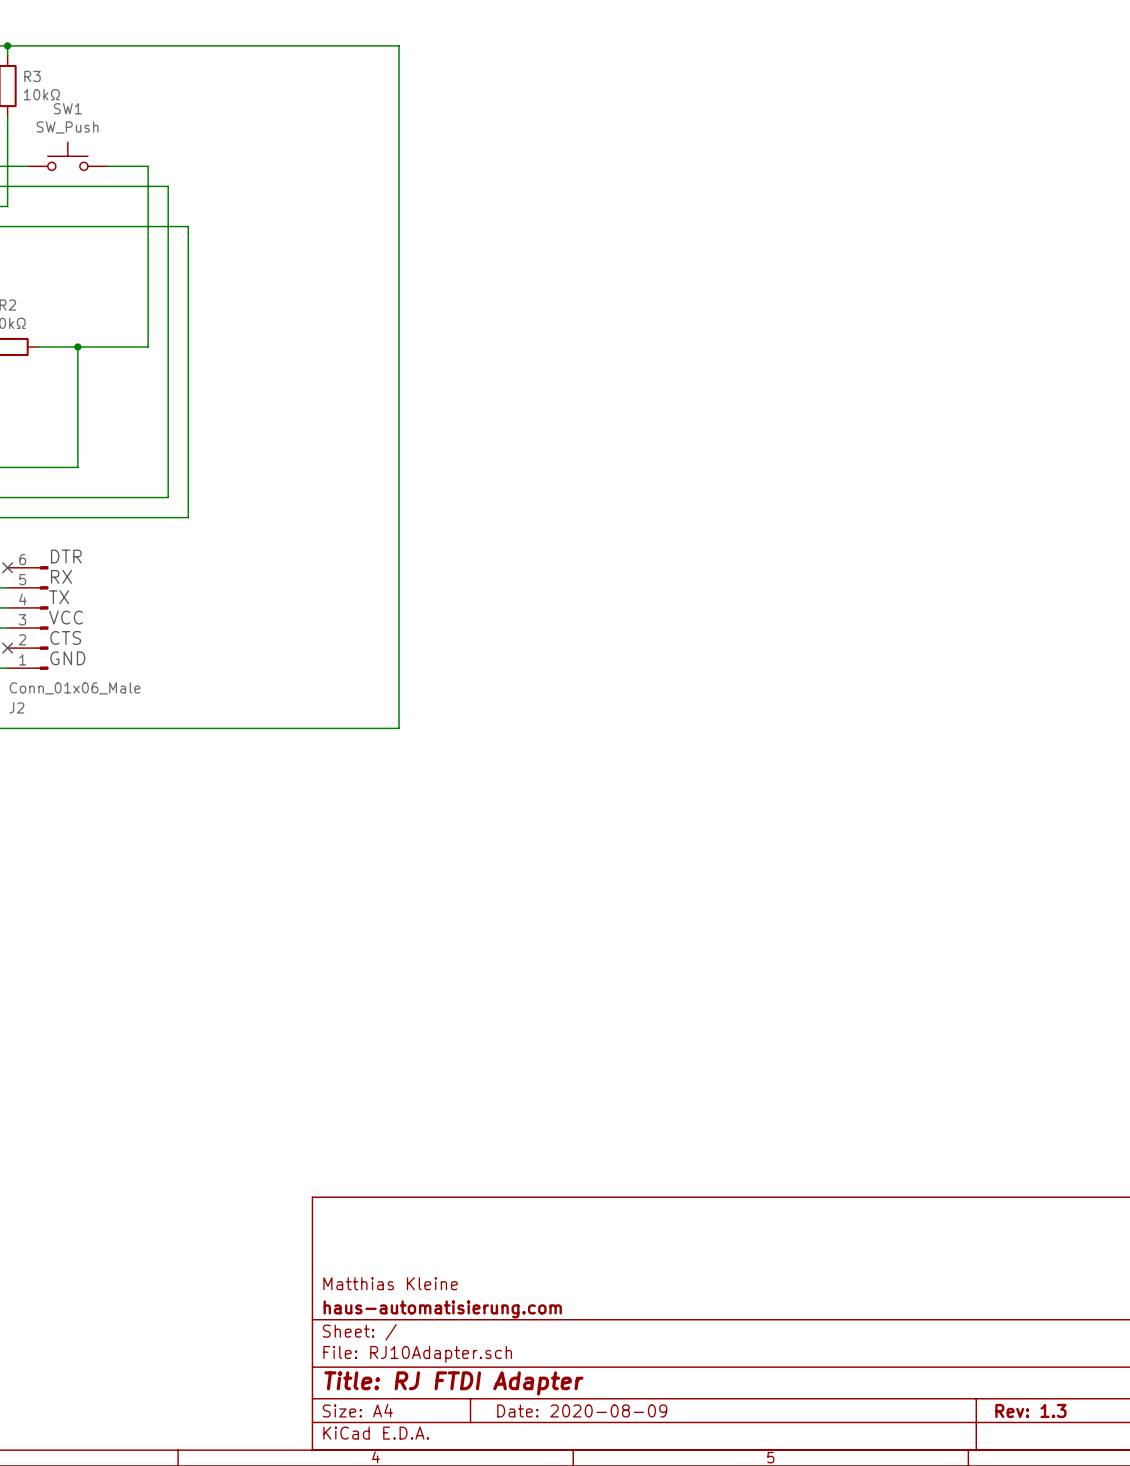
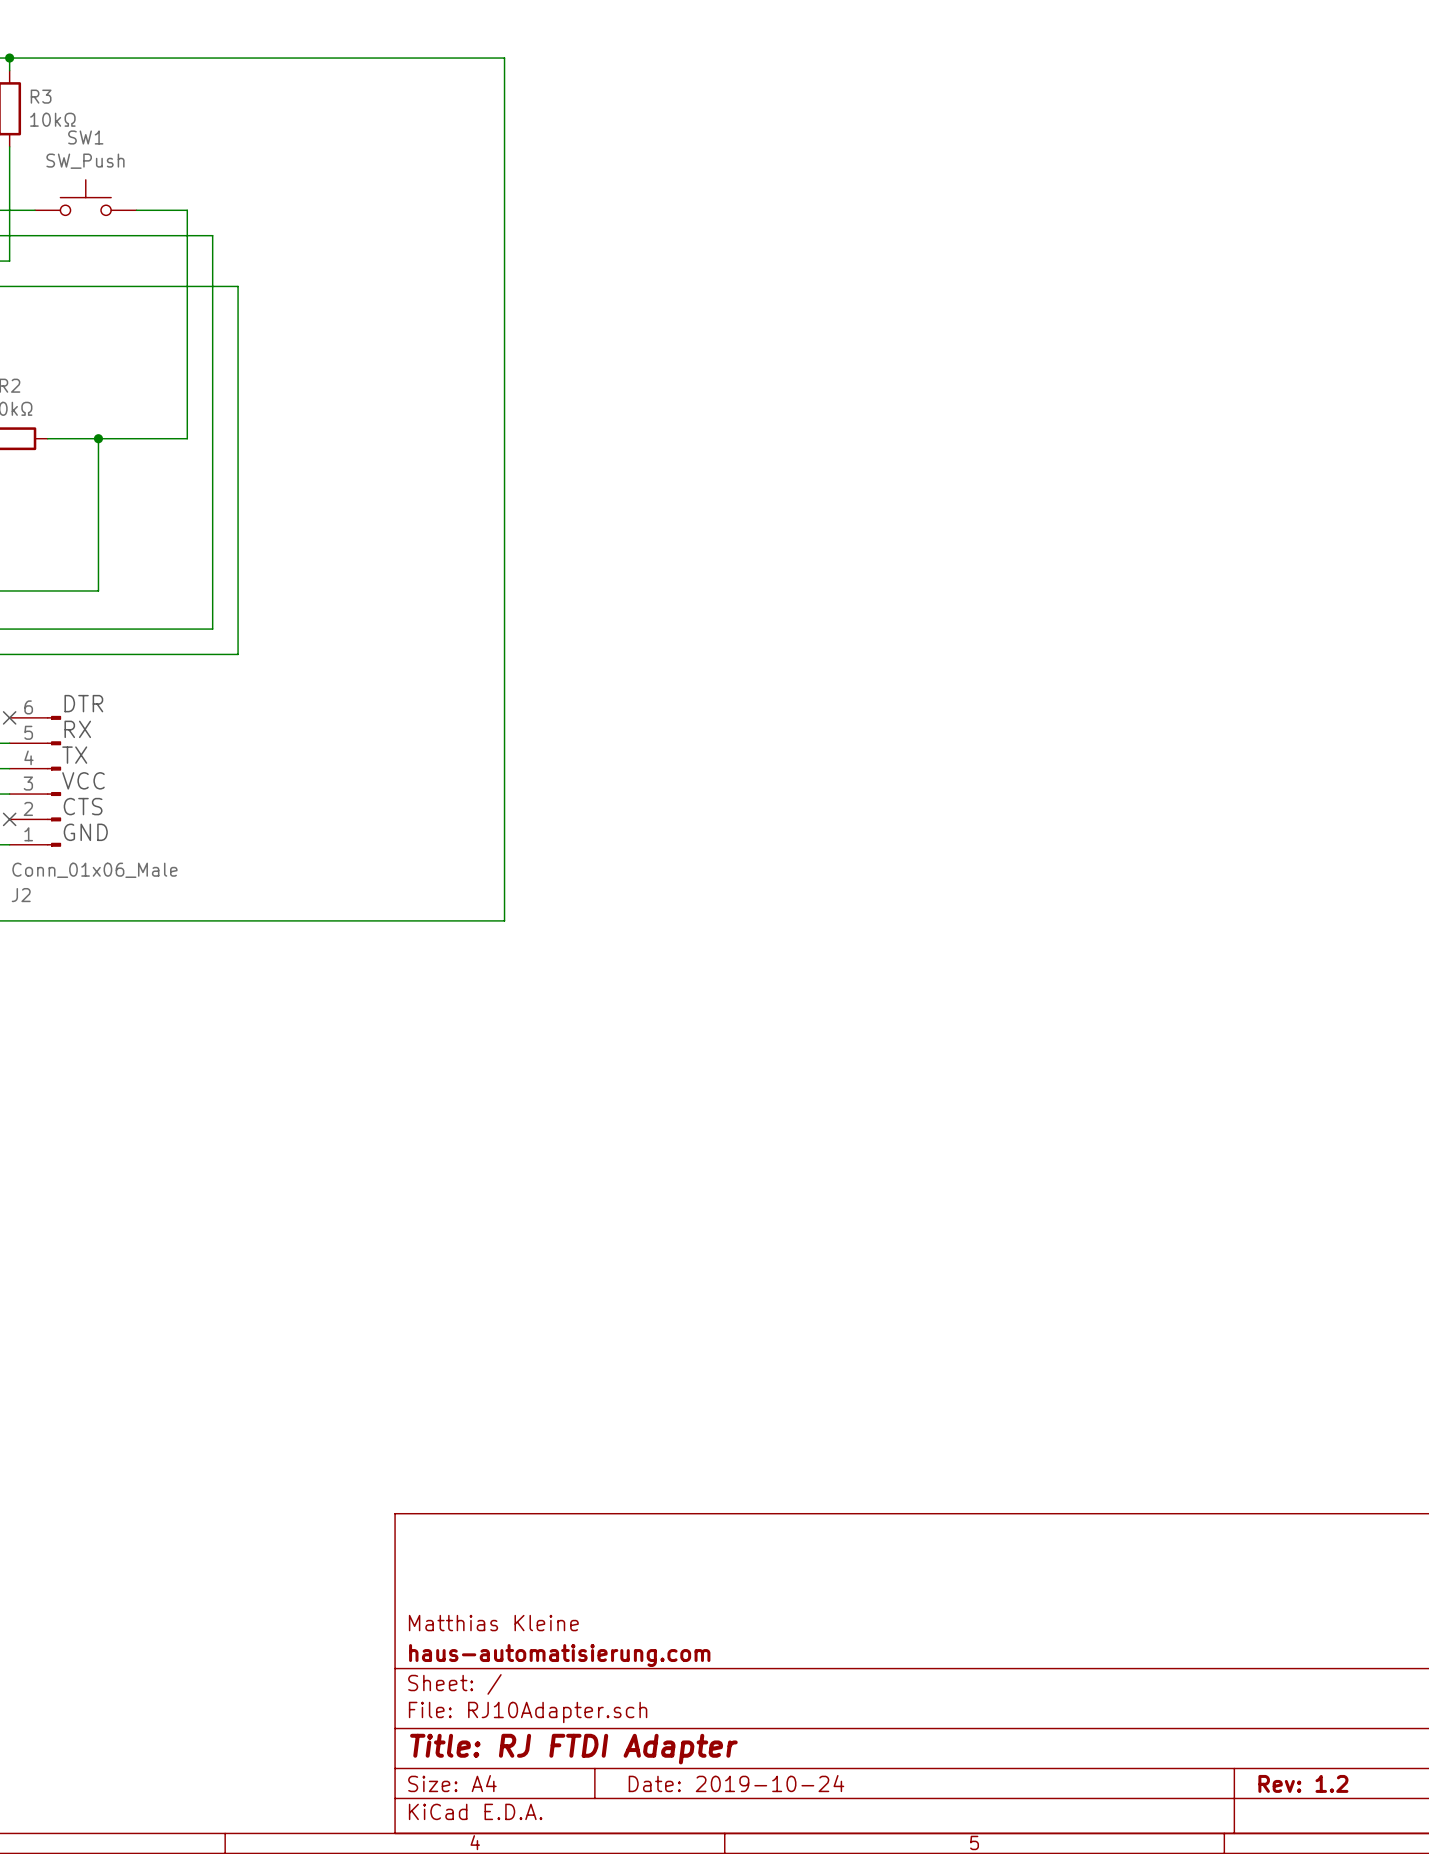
title block: Date: 2020-08-09 (582, 1410) -> Date: 2019-10-24 (736, 1783)
title block: Rev: 1.3 (1030, 1410) -> Rev: 1.2 (1303, 1783)

